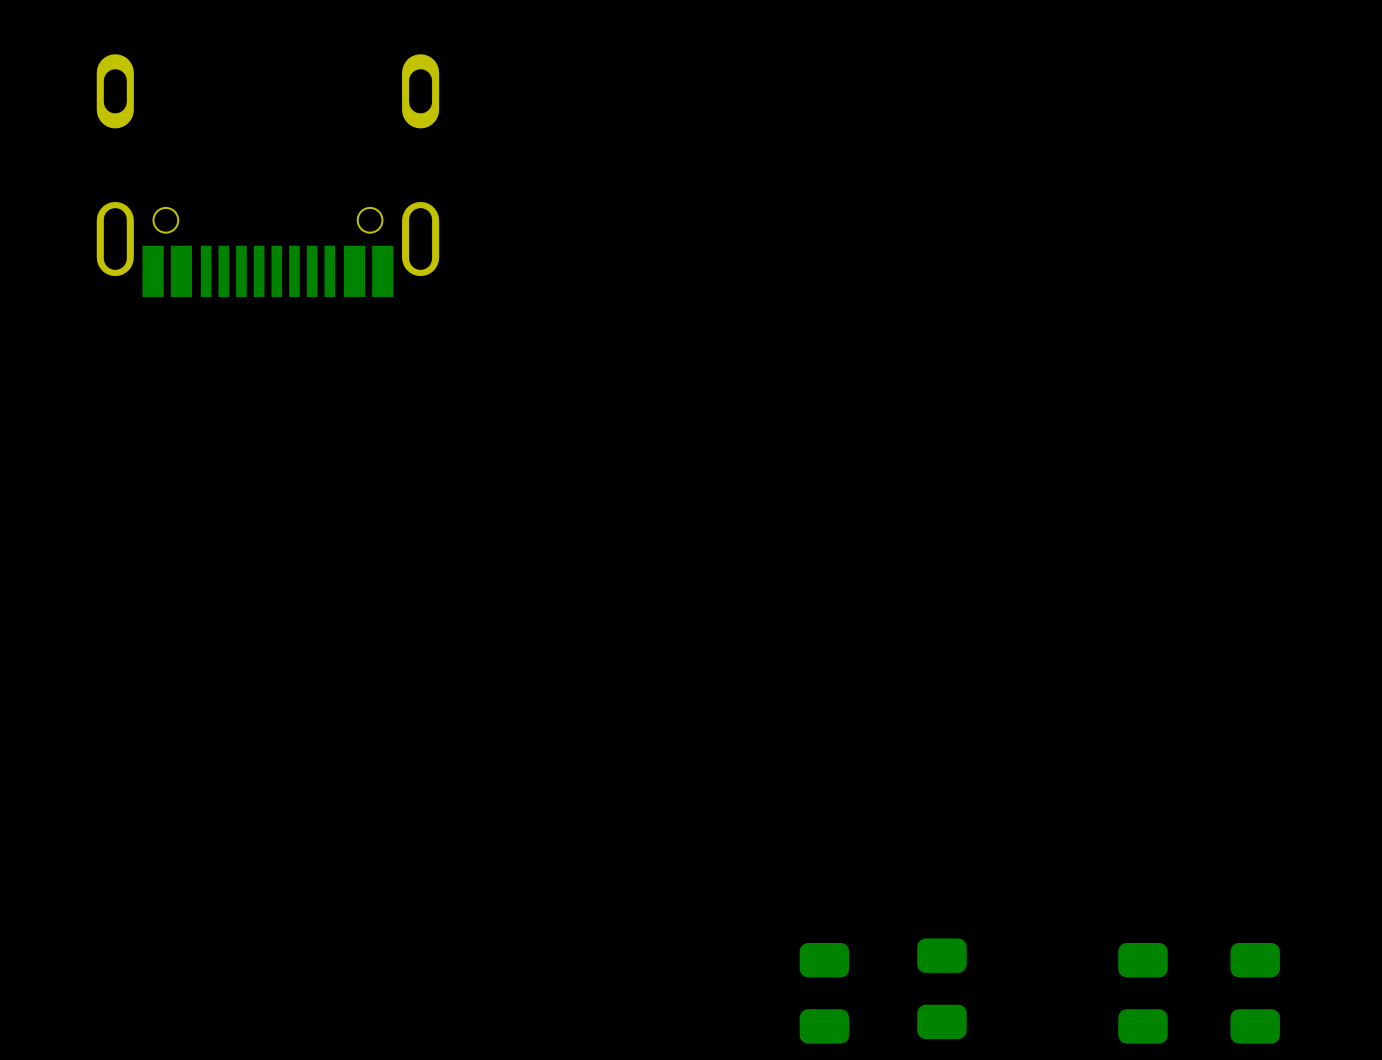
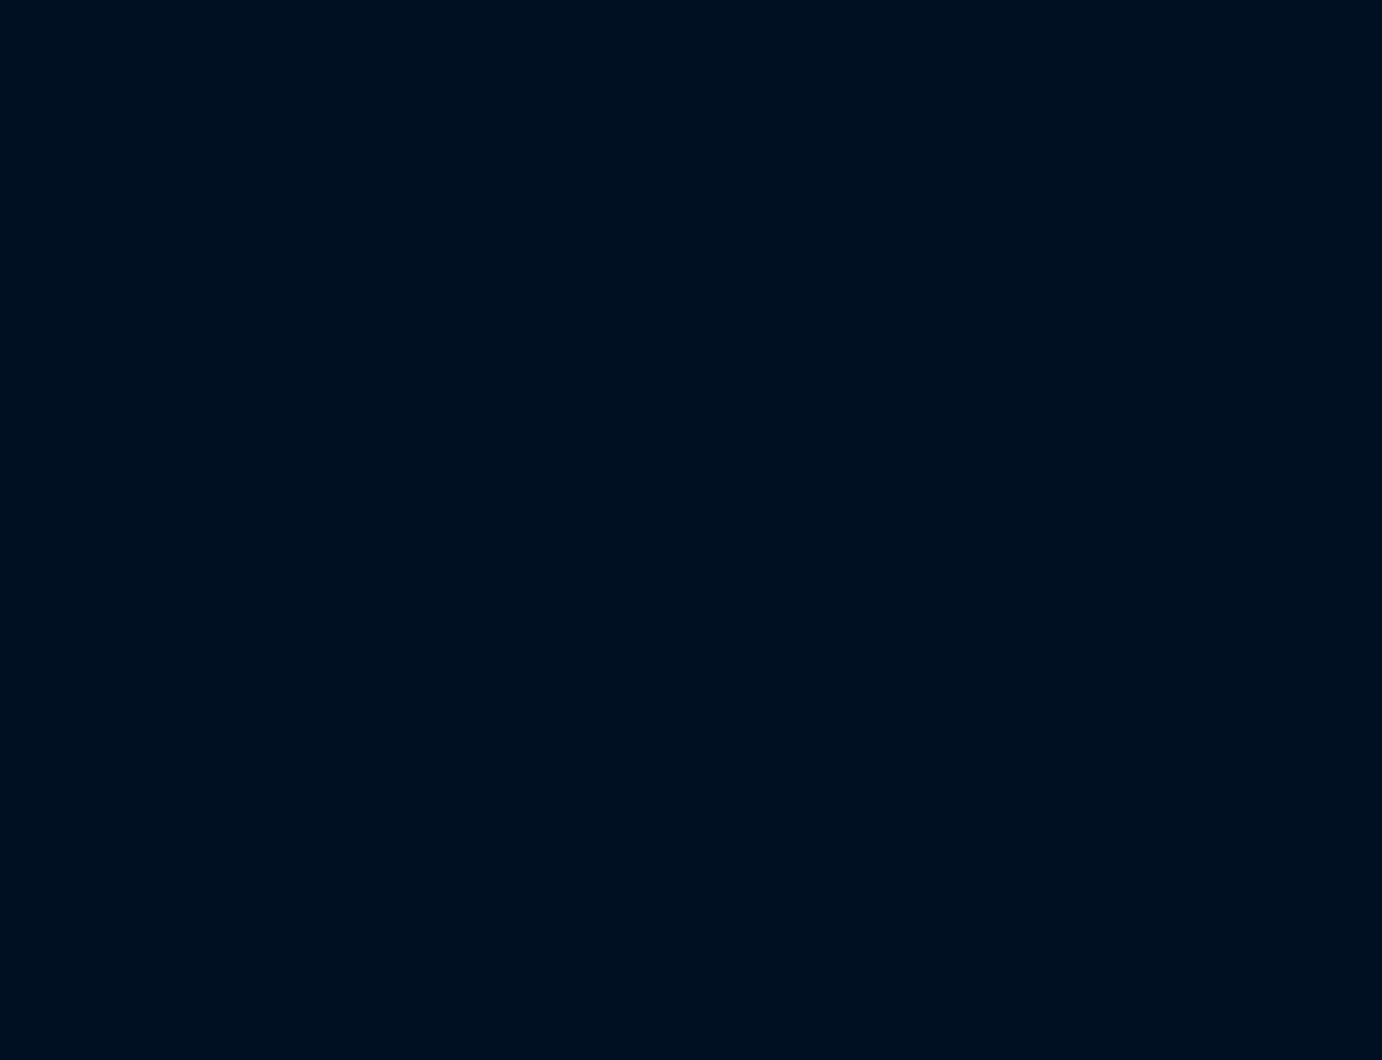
part: (267, 175) -> none
part: (941, 988) -> none
part: (824, 993) -> none
part: (1143, 993) -> none
part: (1255, 993) -> none

